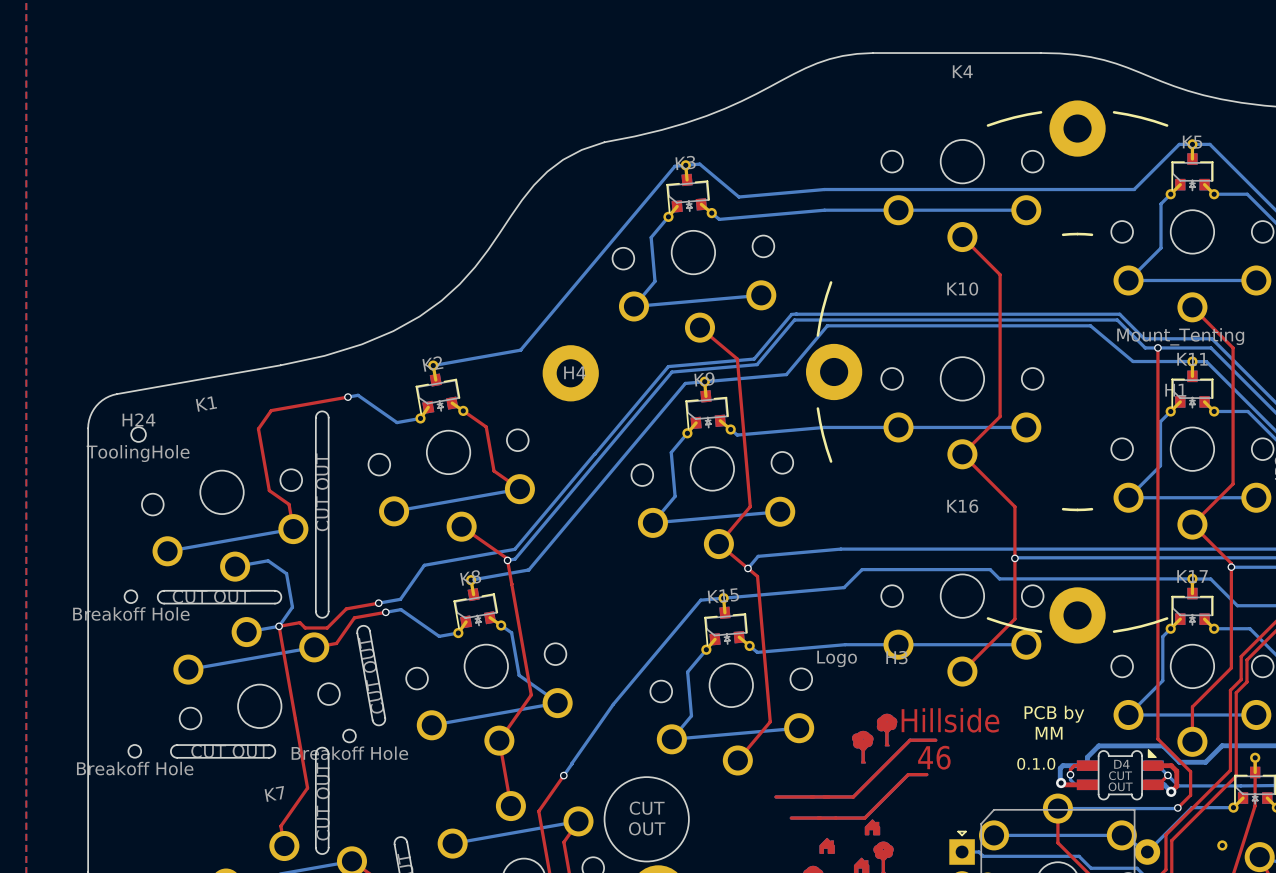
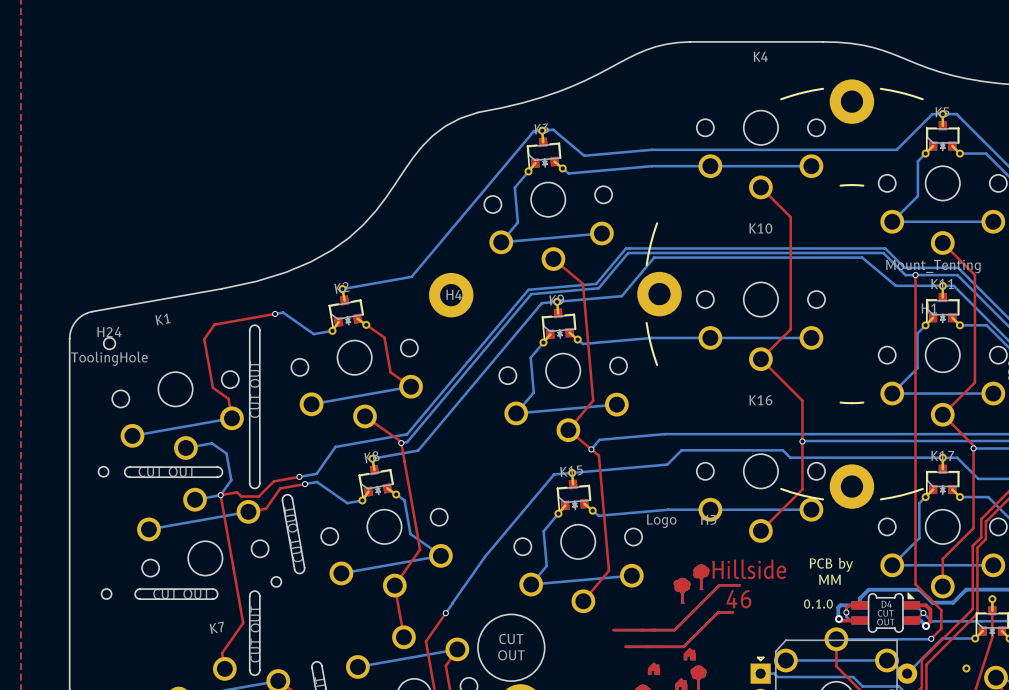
part value: Breakoff Hole (131, 613) -> none
part value: Breakoff Hole (349, 753) -> none
part value: Breakoff Hole (135, 768) -> none

